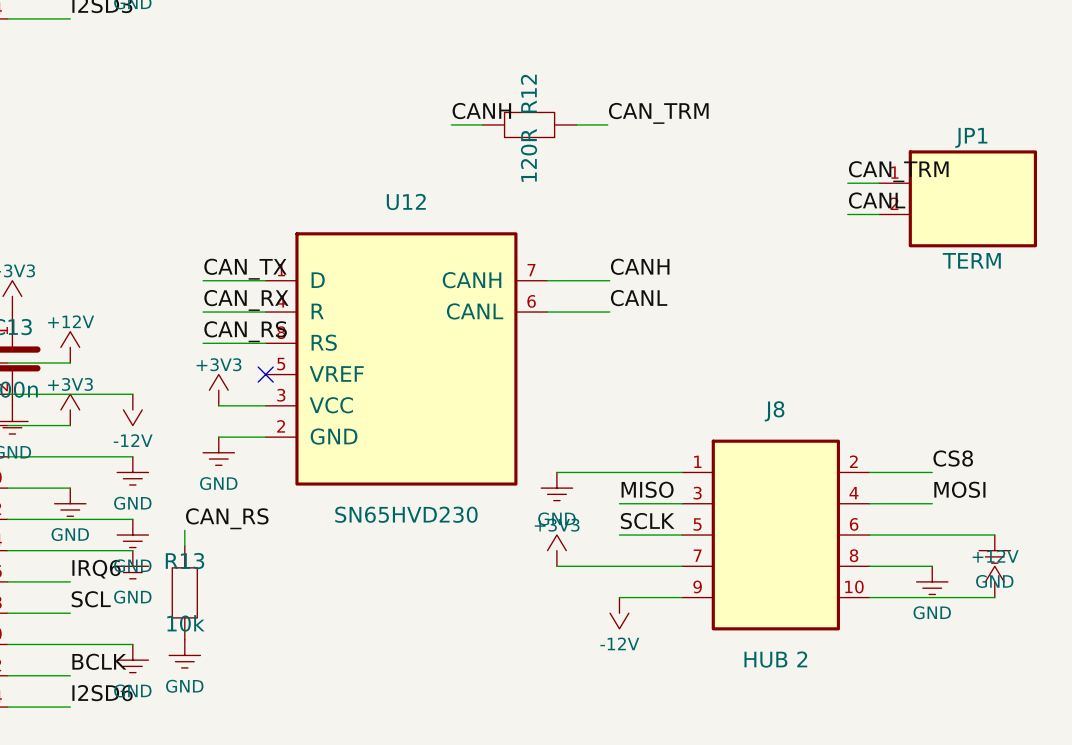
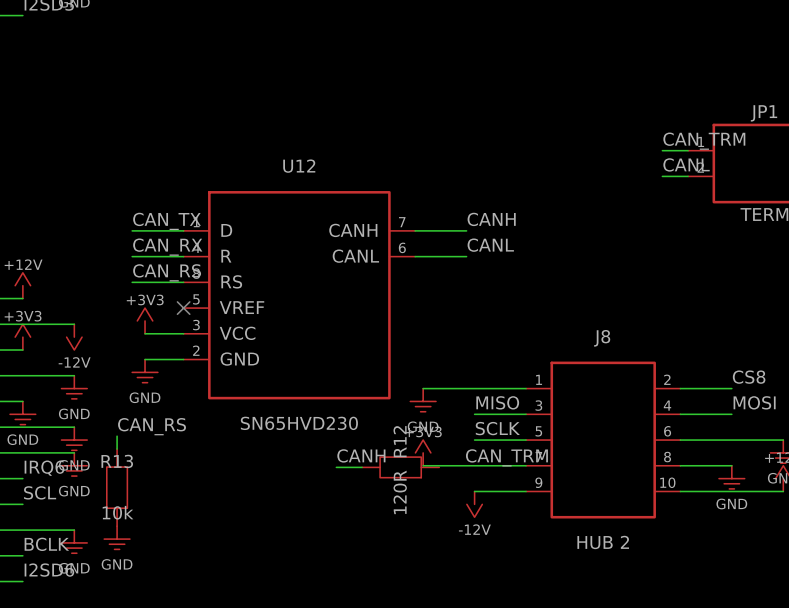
label: CANH (481, 111) -> none
label: CAN_TRM (658, 113) -> none
wire: (451, 124) (482, 124) -> none
R12 position: (529, 124) -> (400, 467)
wire: (576, 124) (607, 124) -> none
label: none -> CANH (361, 455)
label: none -> CAN_TRM (506, 457)
wire: none -> (336, 467) (362, 467)

